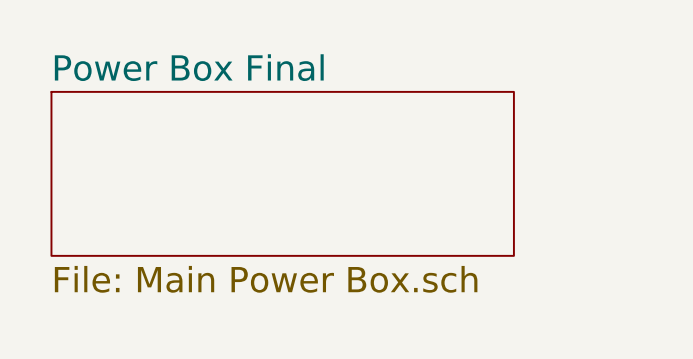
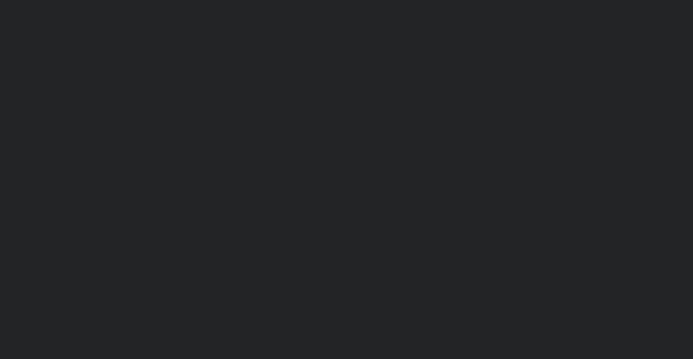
sheet Power Box Final: File: Main Power Box.sch (282, 173) -> none

